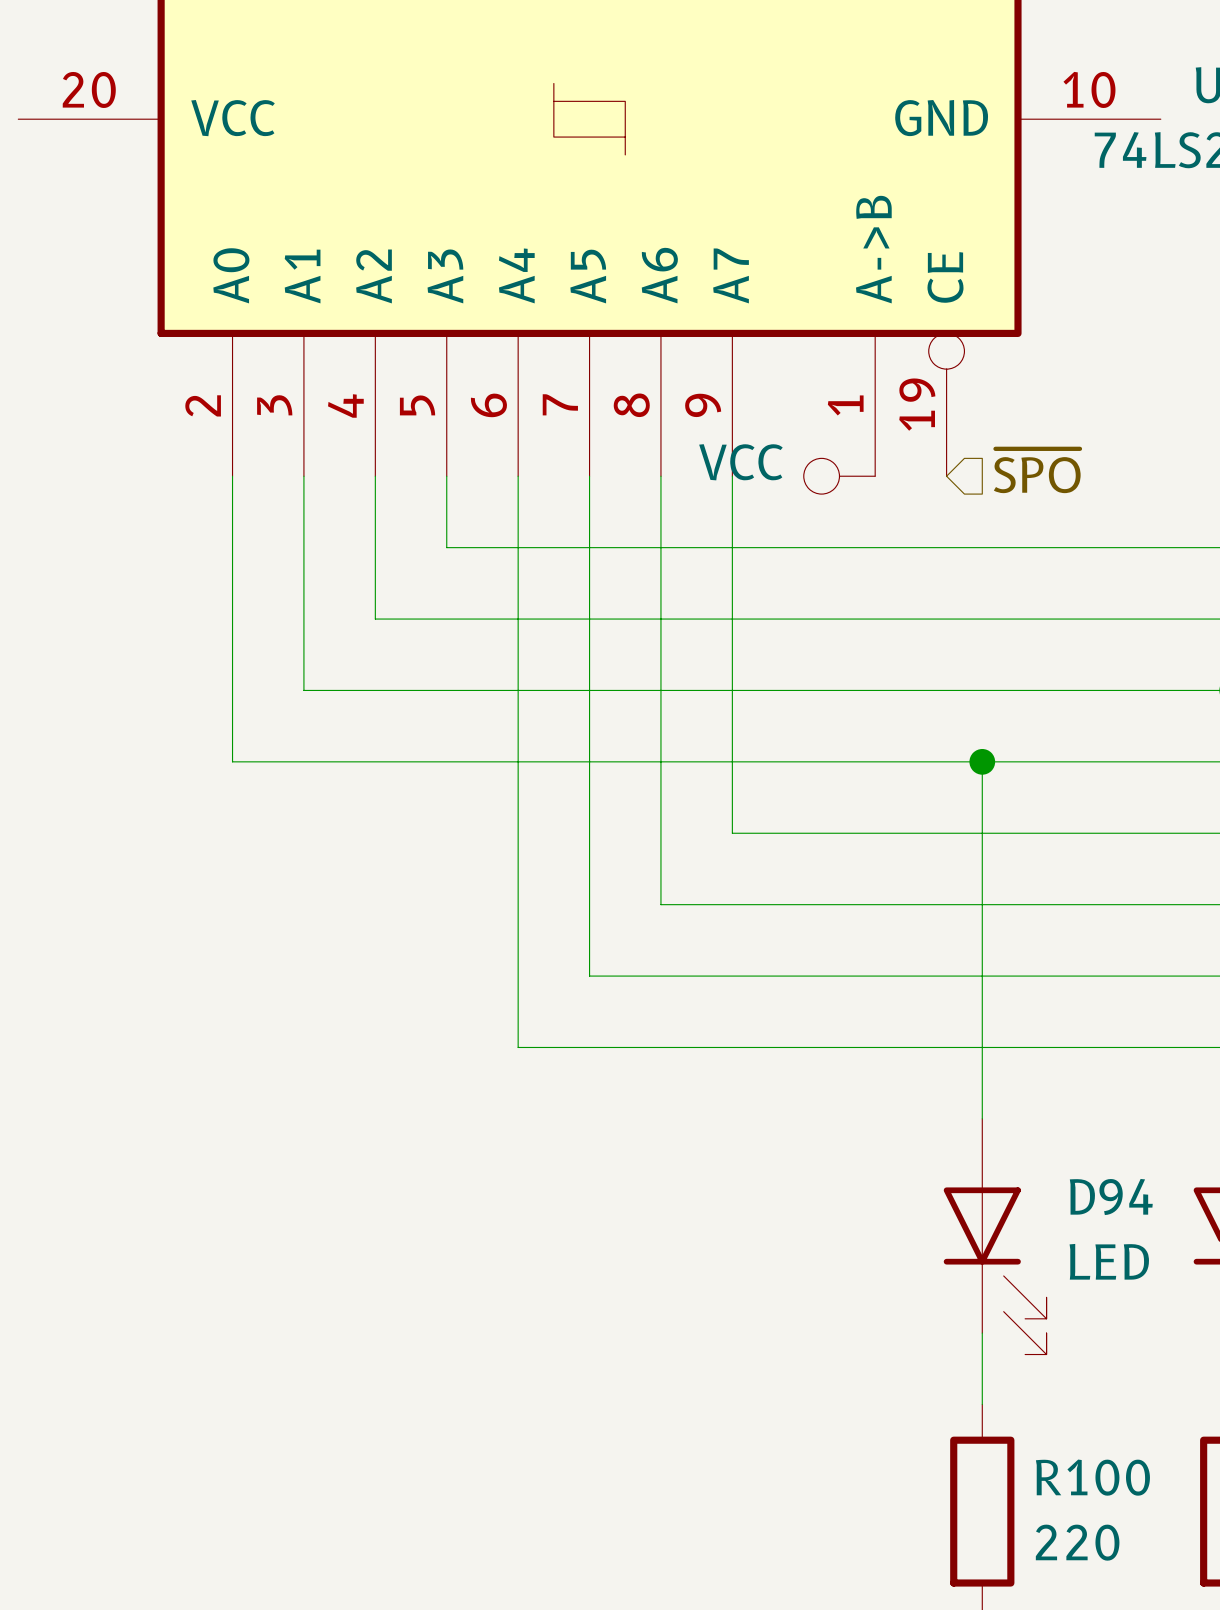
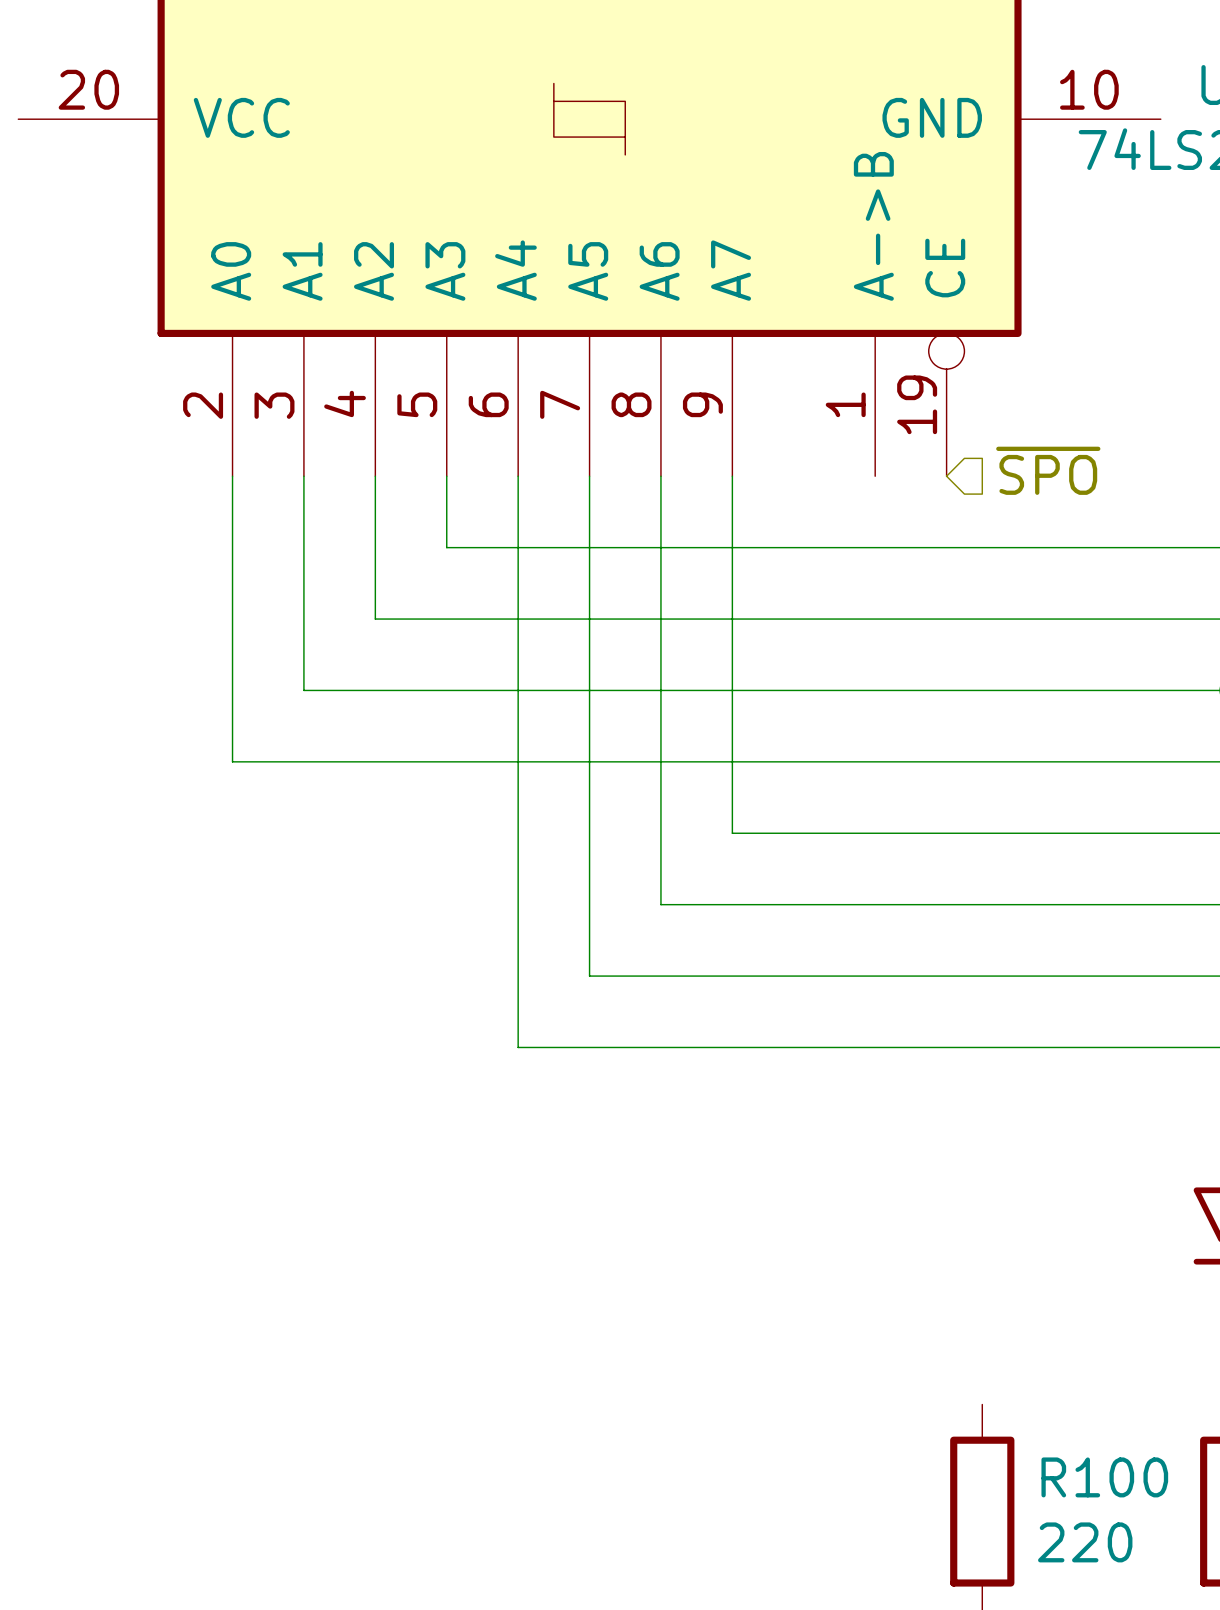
power symbol: VCC (839, 476) -> none
wire: (982, 761) (982, 1118) -> none
junction: (982, 761) -> none
D94: LED (995, 1236) -> none
wire: (982, 1333) (982, 1404) -> none

